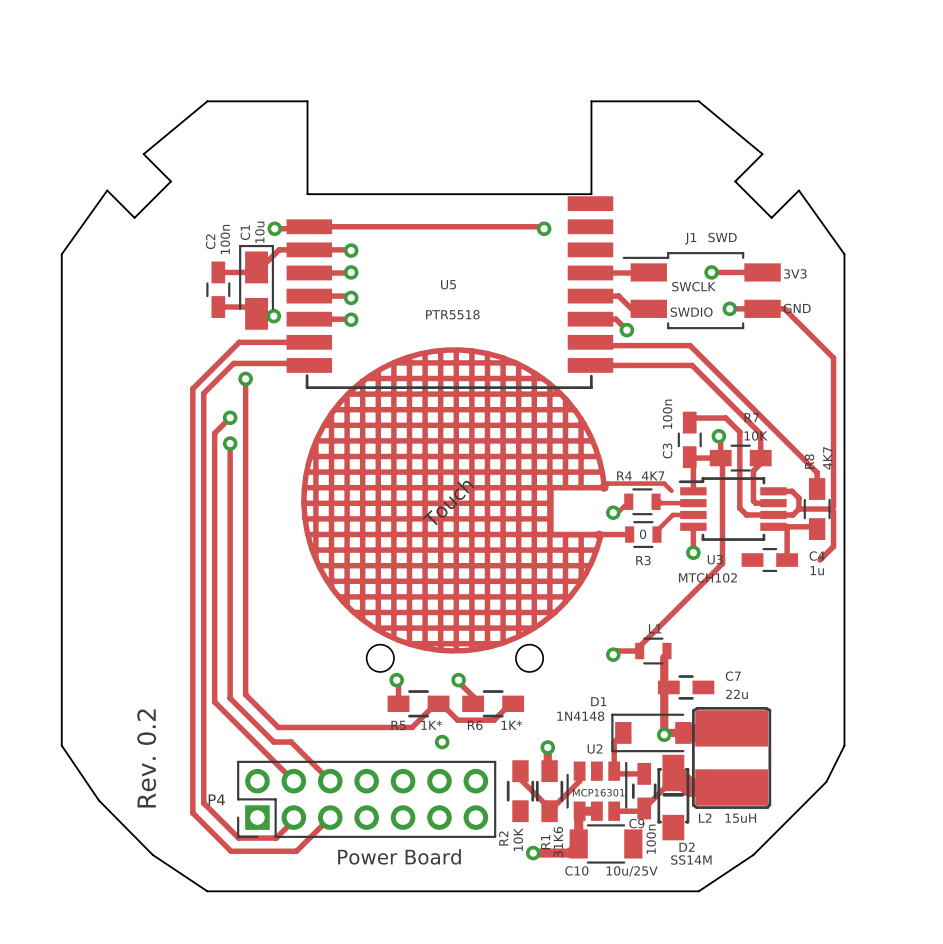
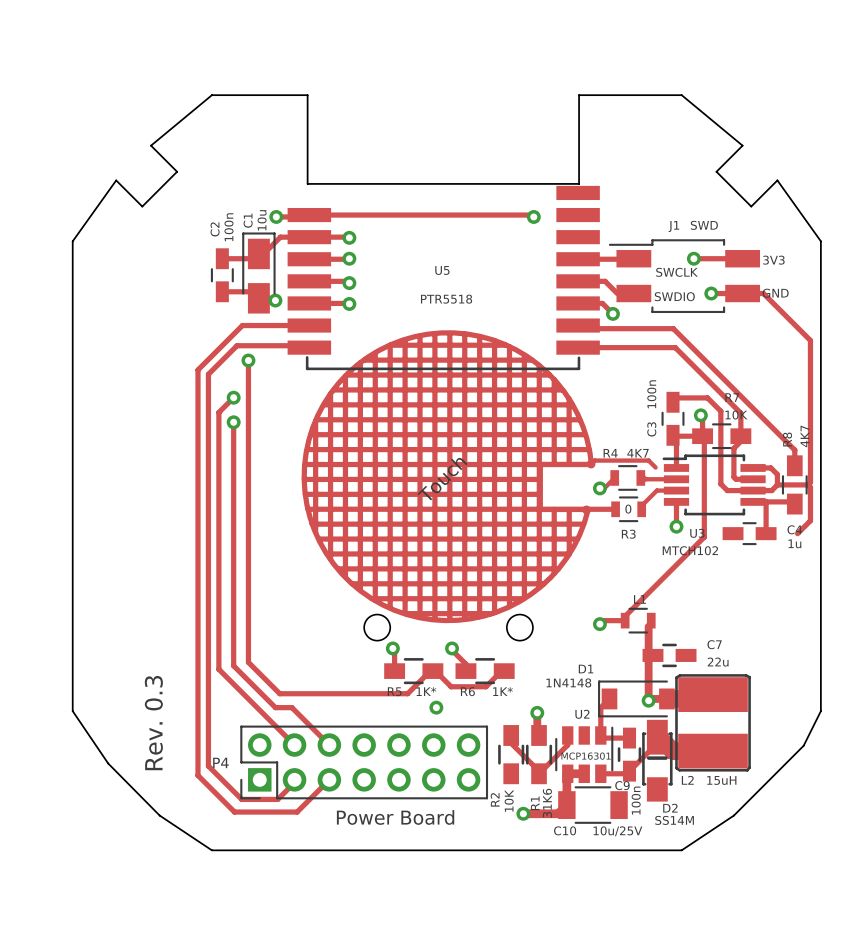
text: Rev. 0.2 (146, 758) -> Rev. 0.3 (153, 723)

